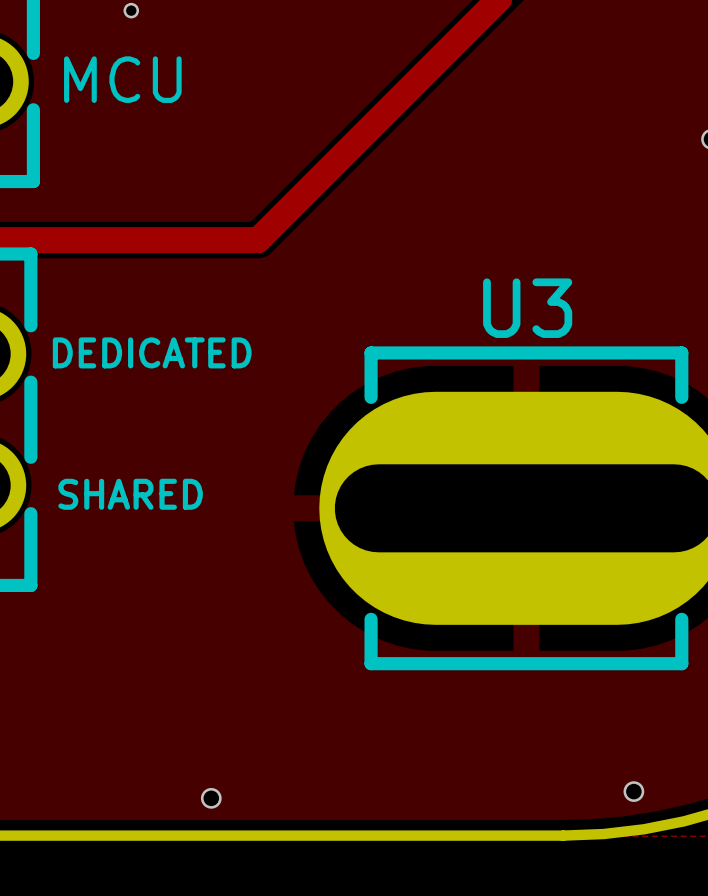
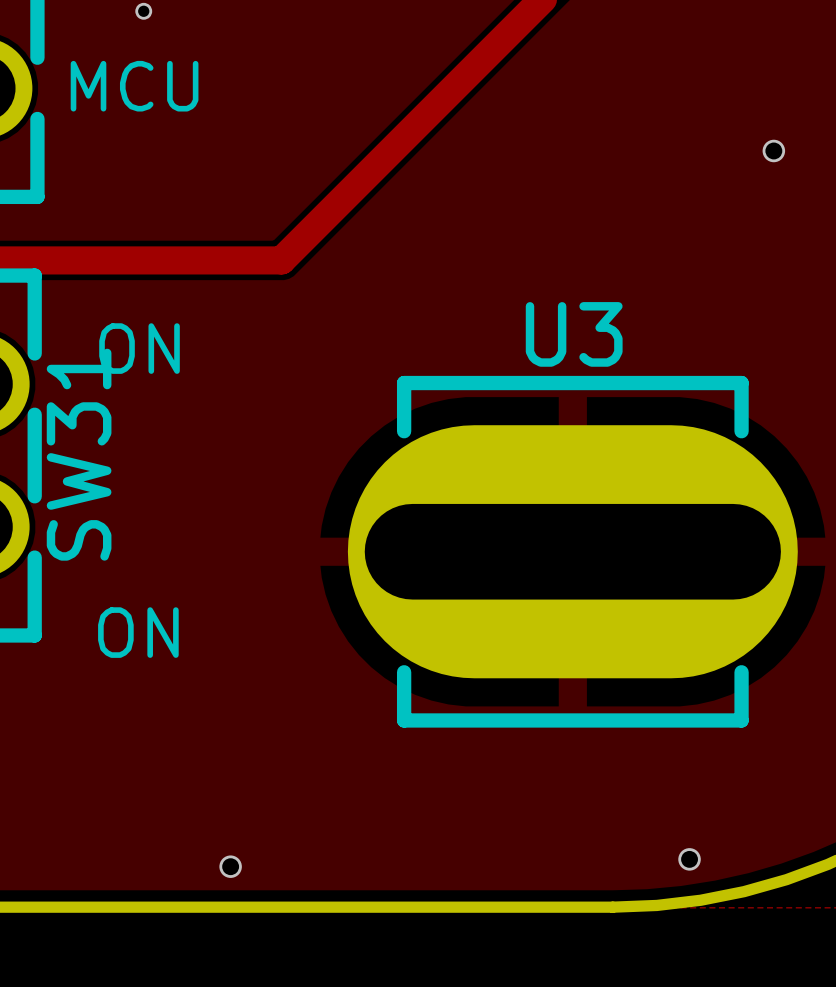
text: DEDICATED (152, 352) -> ON (139, 348)
SW31 name: none -> SW31 (79, 454)
text: SHARED (130, 494) -> none
text: none -> ON (138, 632)

